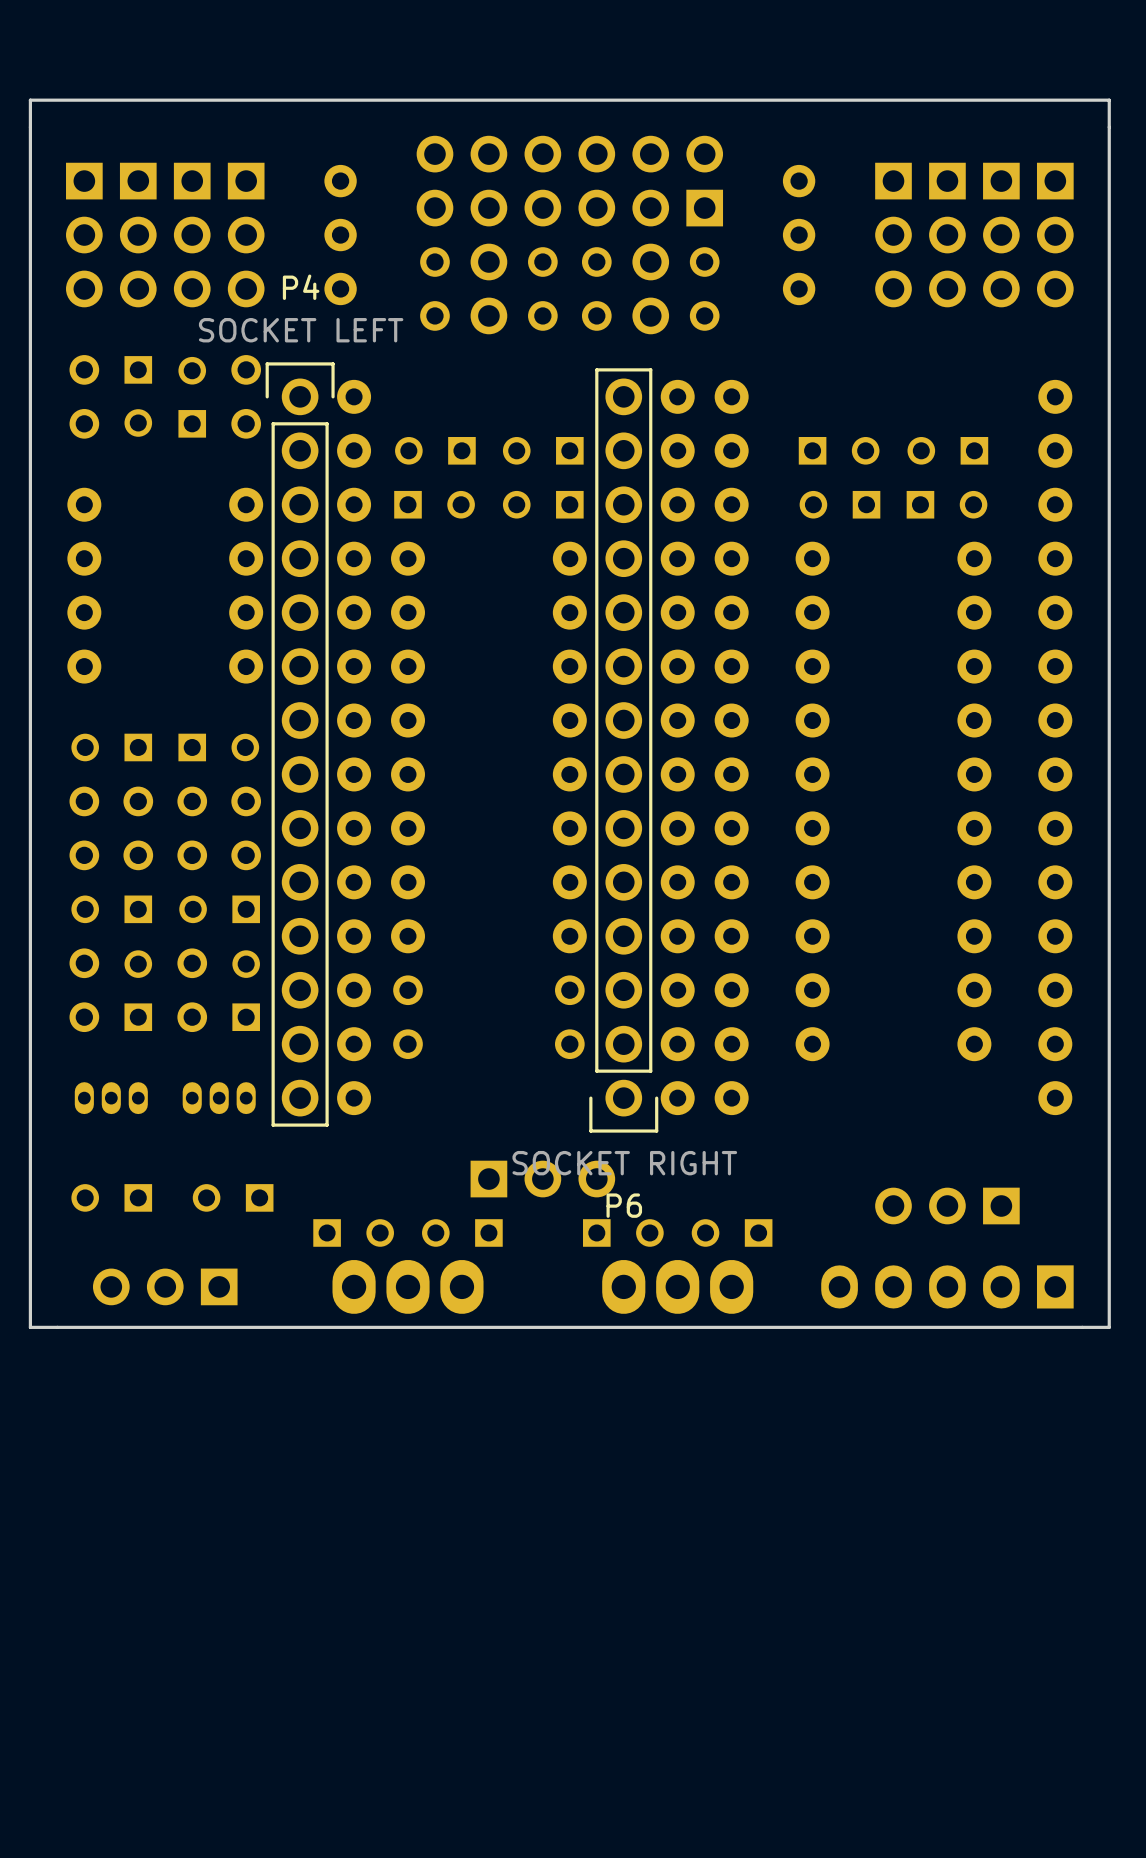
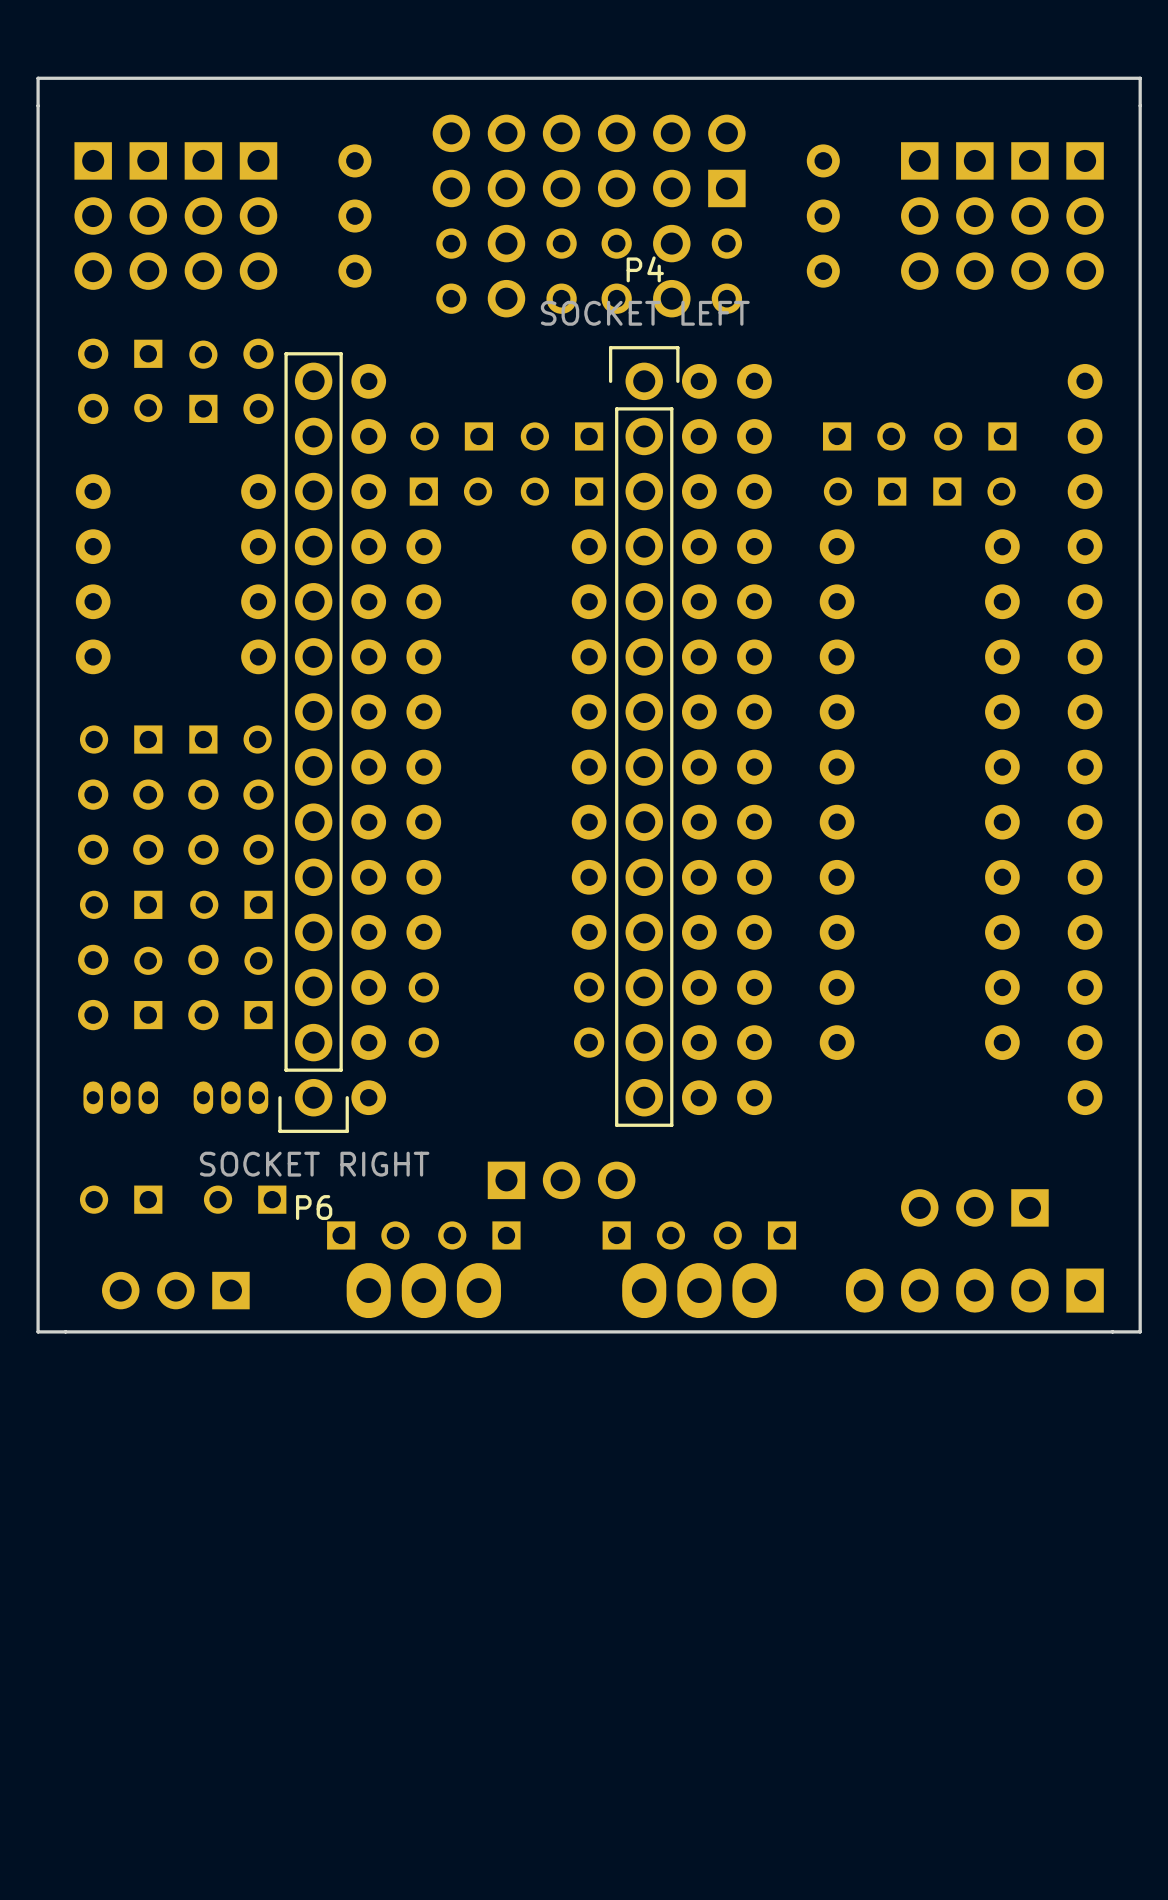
P4 position: (300, 744) -> (644, 736)
P6 position: (623, 750) -> (313, 742)

